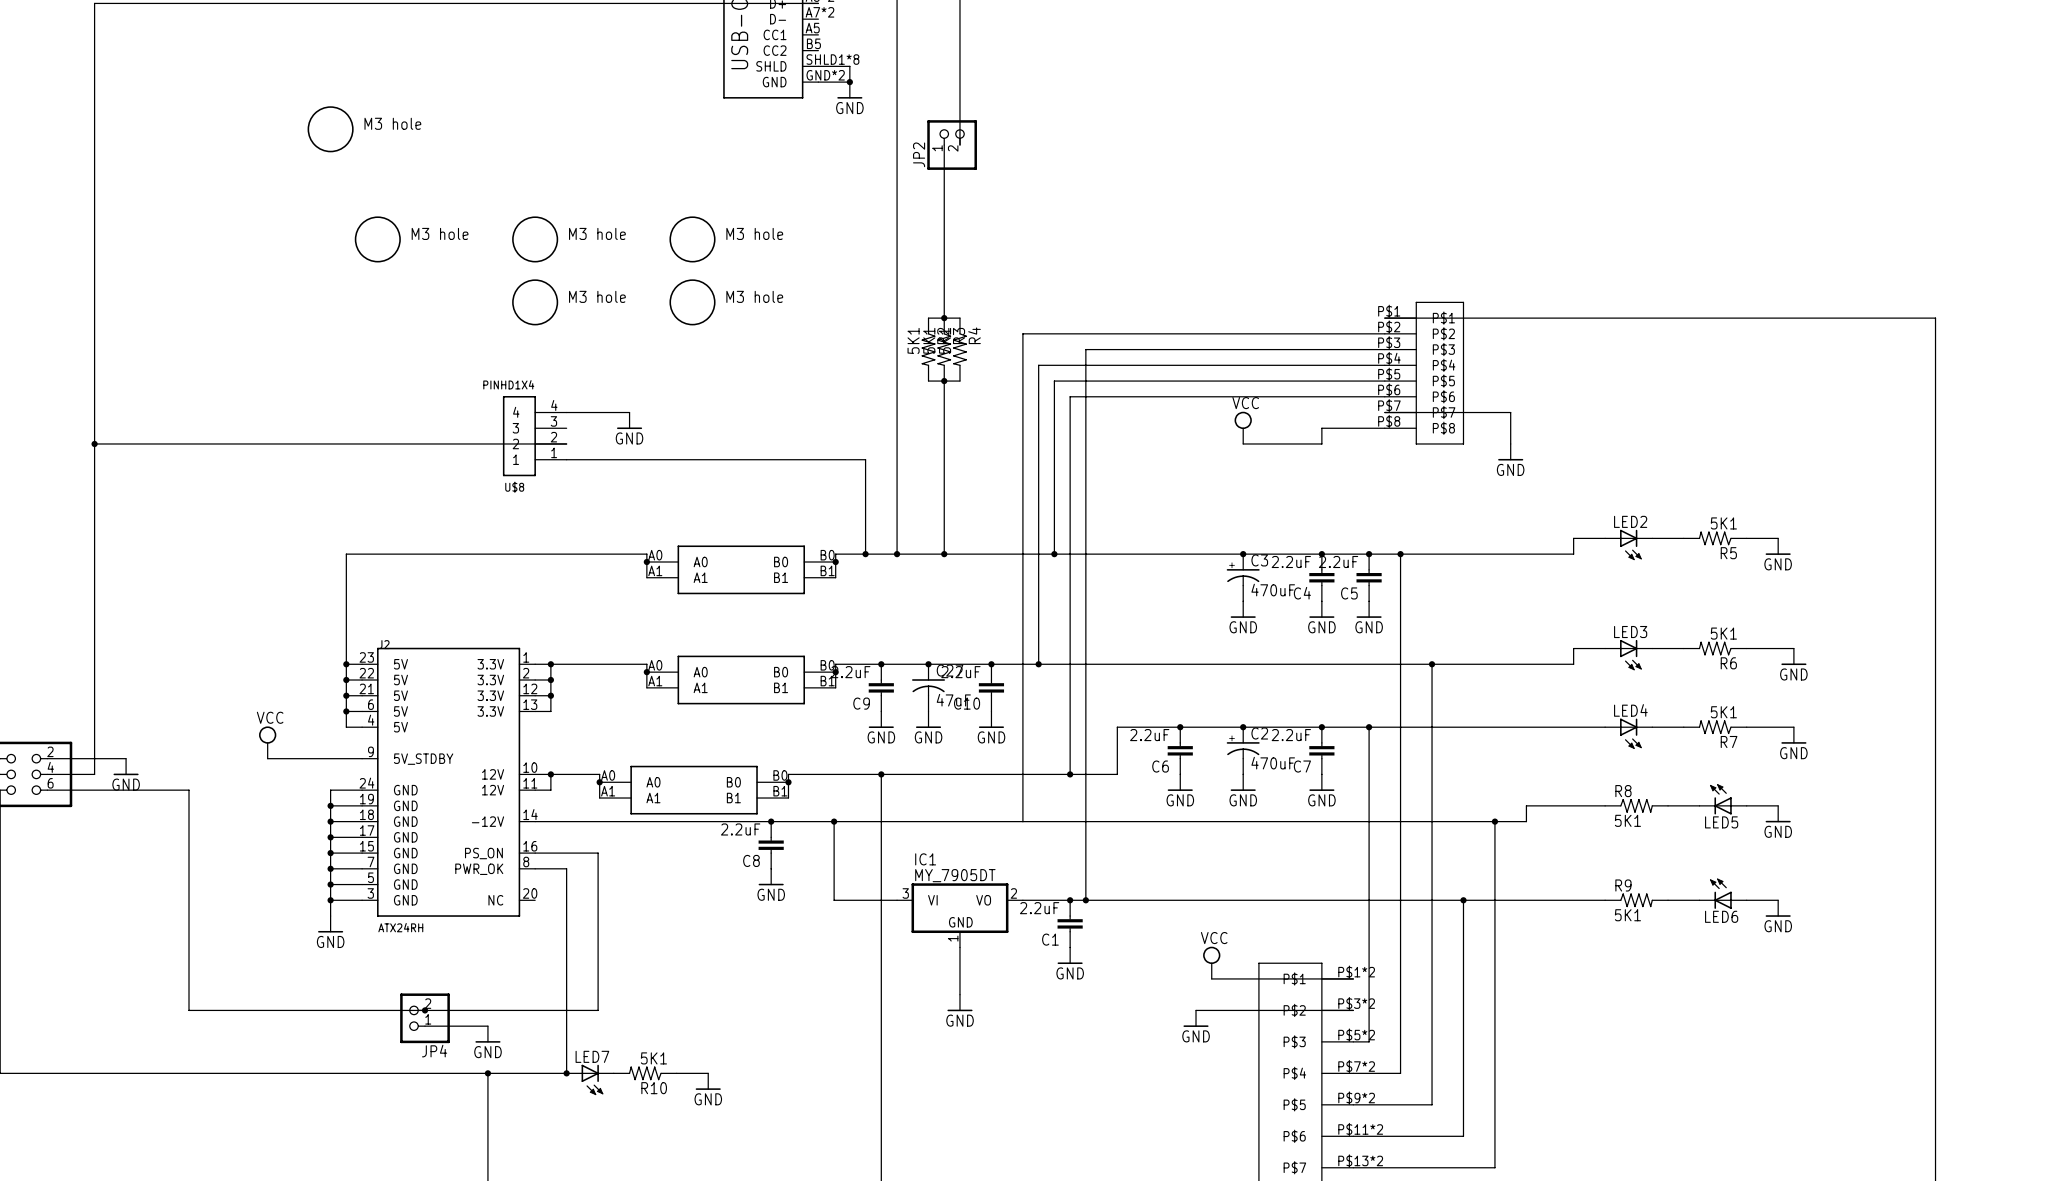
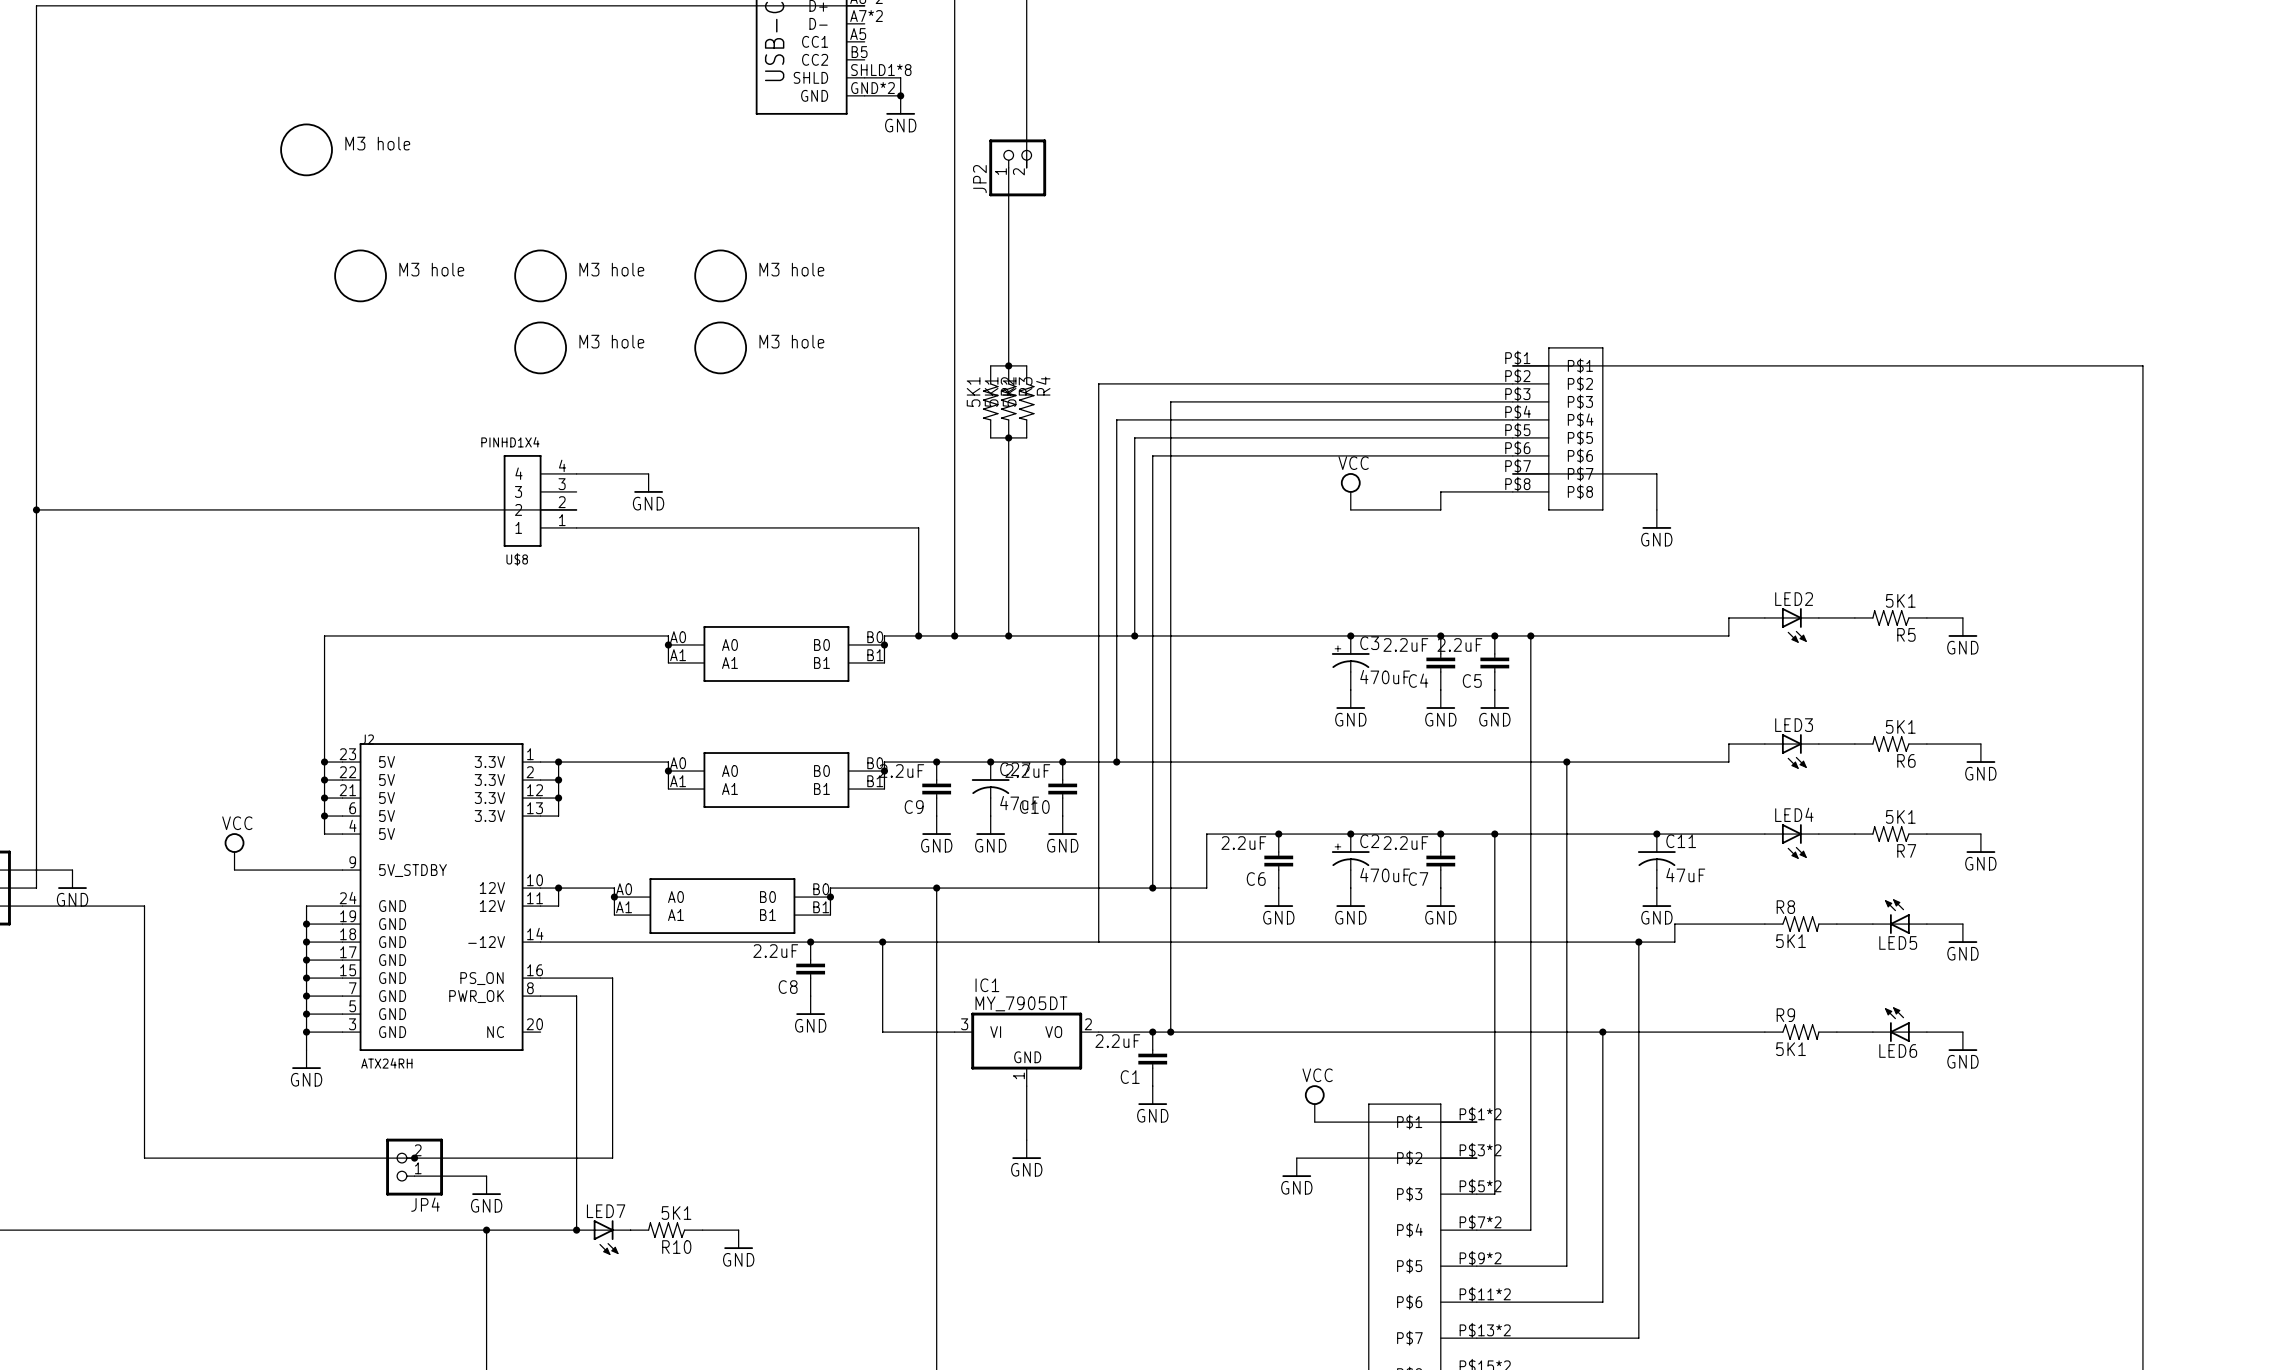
junction: none -> (1656, 834)
C11: none -> 47uF (1656, 861)
power symbol: none -> GND (1656, 897)

